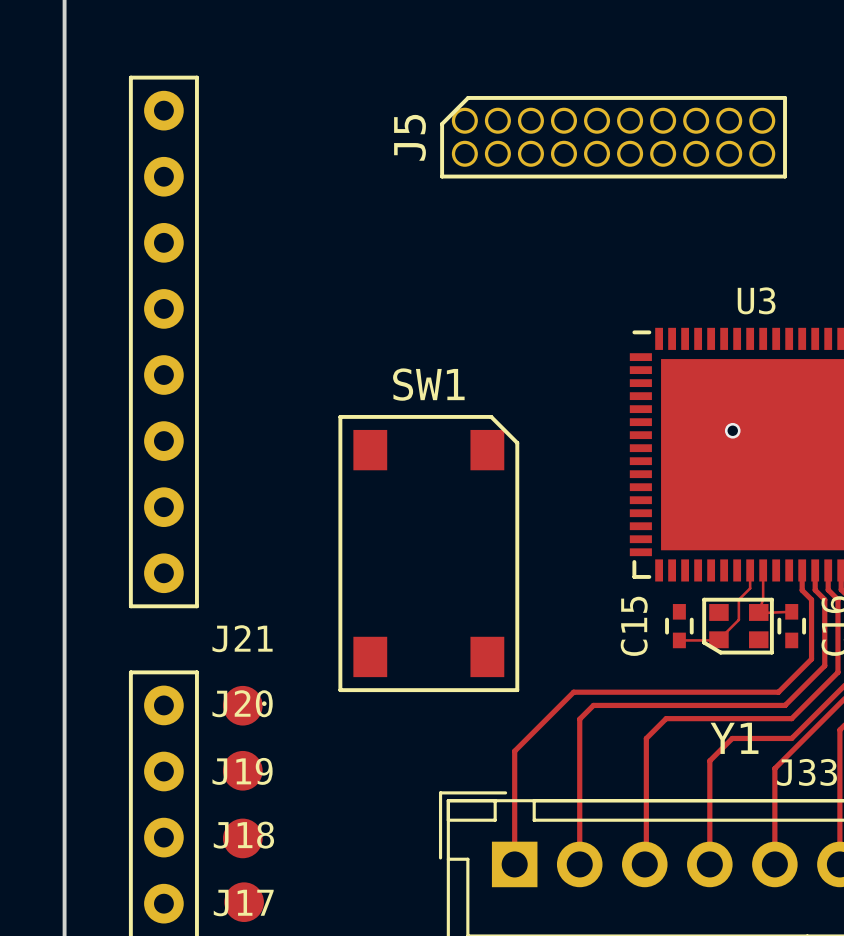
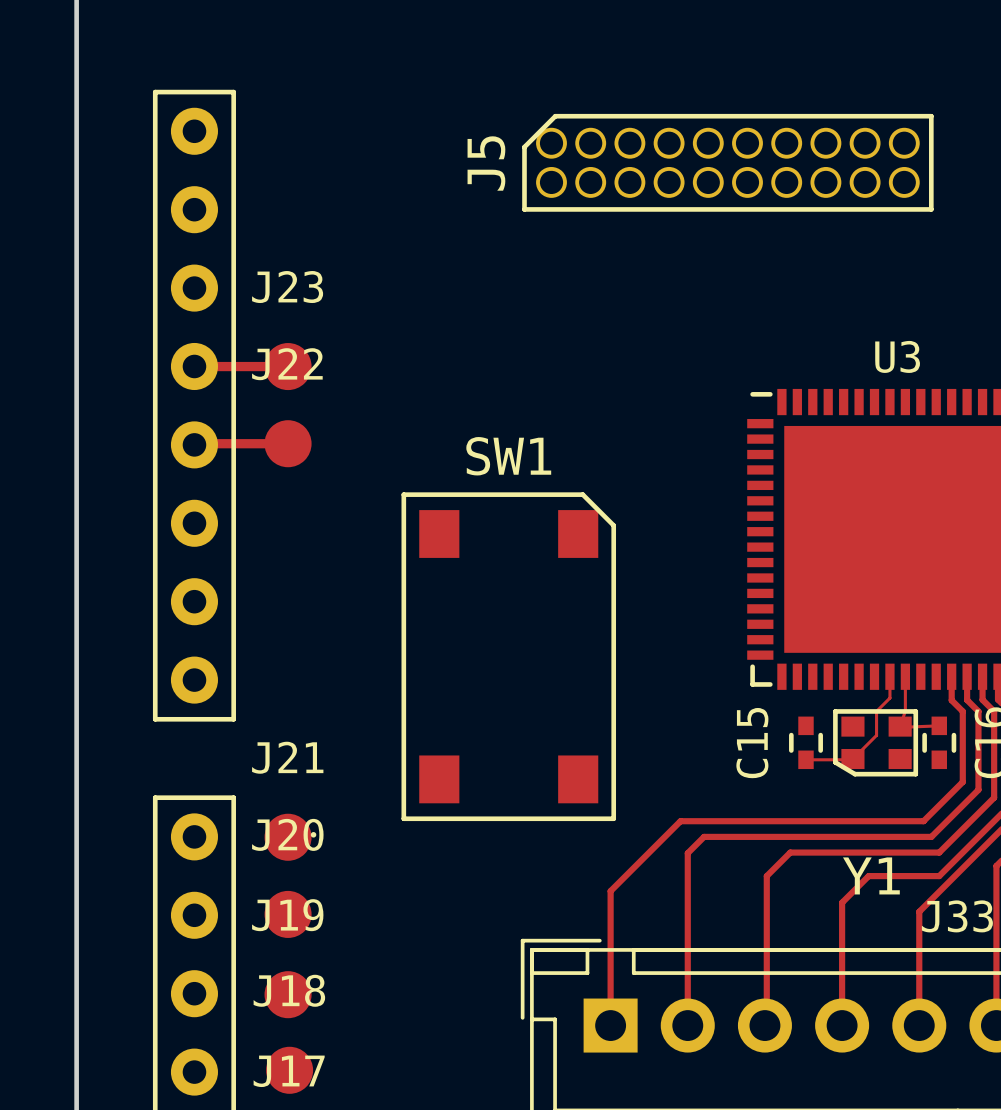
track: none -> (194, 366) (288, 366)
J23: none -> (288, 366)
track: none -> (195, 443) (288, 443)
J22: none -> (288, 443)
via: (732, 430) -> none

